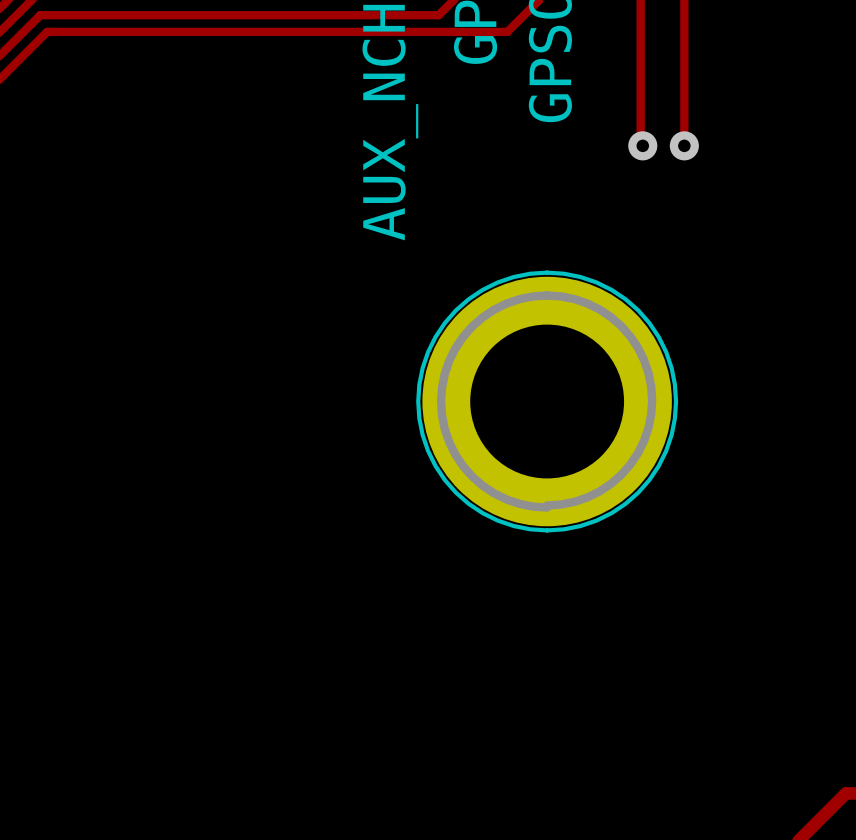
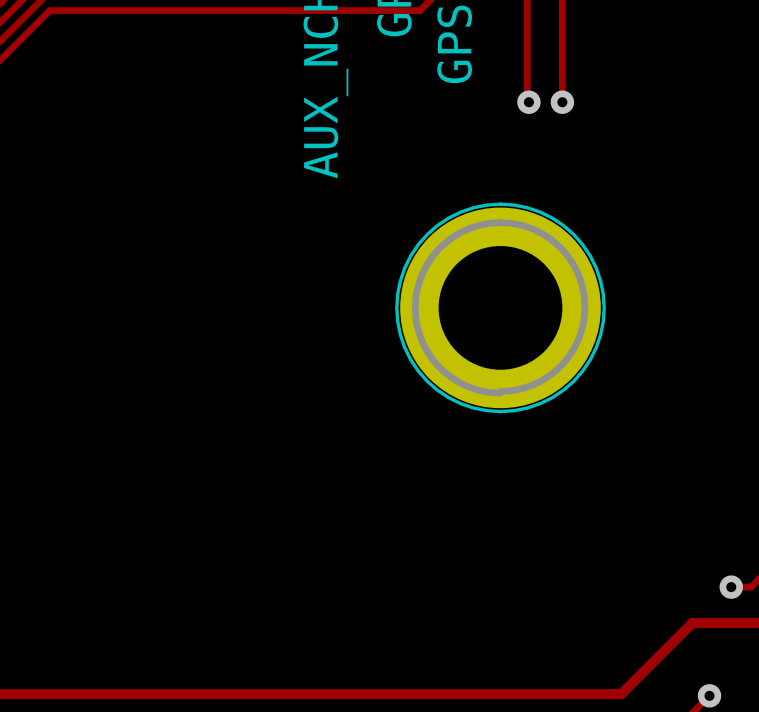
part position: (547, 401) -> (500, 307)

